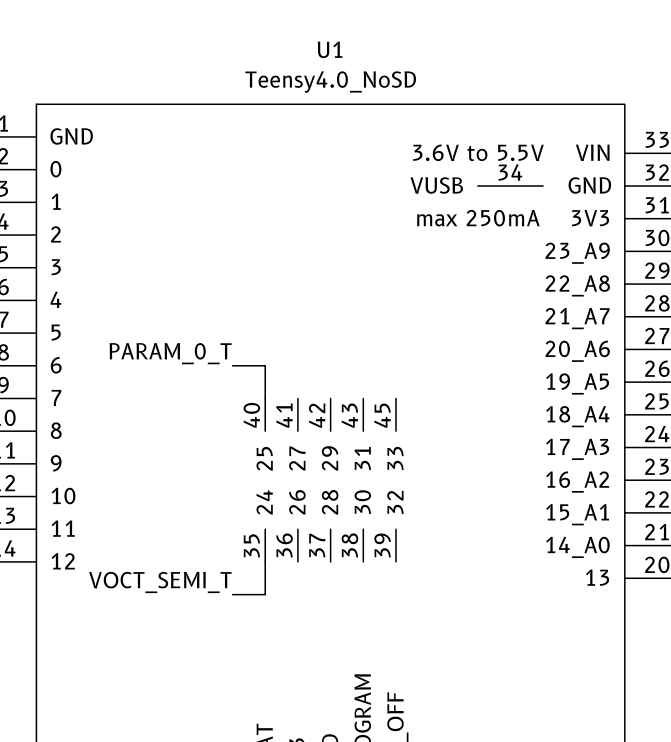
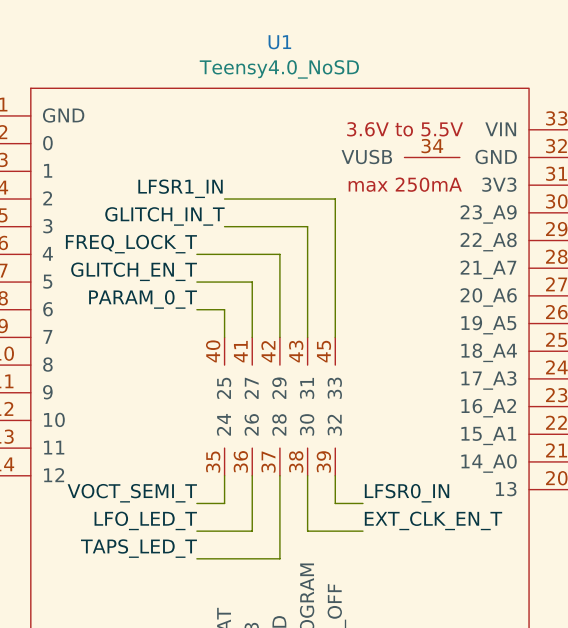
label: none -> LFSR1_IN (180, 188)
wire: none -> (224, 199) (335, 199) (335, 337)
label: none -> GLITCH_IN_T (164, 216)
wire: none -> (224, 226) (307, 226) (307, 337)
label: none -> FREQ_LOCK_T (131, 244)
wire: none -> (196, 254) (279, 254) (279, 337)
label: none -> GLITCH_EN_T (134, 271)
wire: none -> (196, 282) (252, 282) (252, 337)
wire: none -> (252, 475) (252, 531) (196, 531)
wire: none -> (279, 475) (279, 558) (196, 558)
wire: none -> (307, 475) (307, 531) (362, 531)
wire: none -> (335, 475) (335, 503) (362, 503)
label: none -> LFSR0_IN (407, 493)
label: none -> LFO_LED_T (145, 520)
label: none -> EXT_CLK_EN_T (433, 520)
label: none -> TAPS_LED_T (138, 548)

